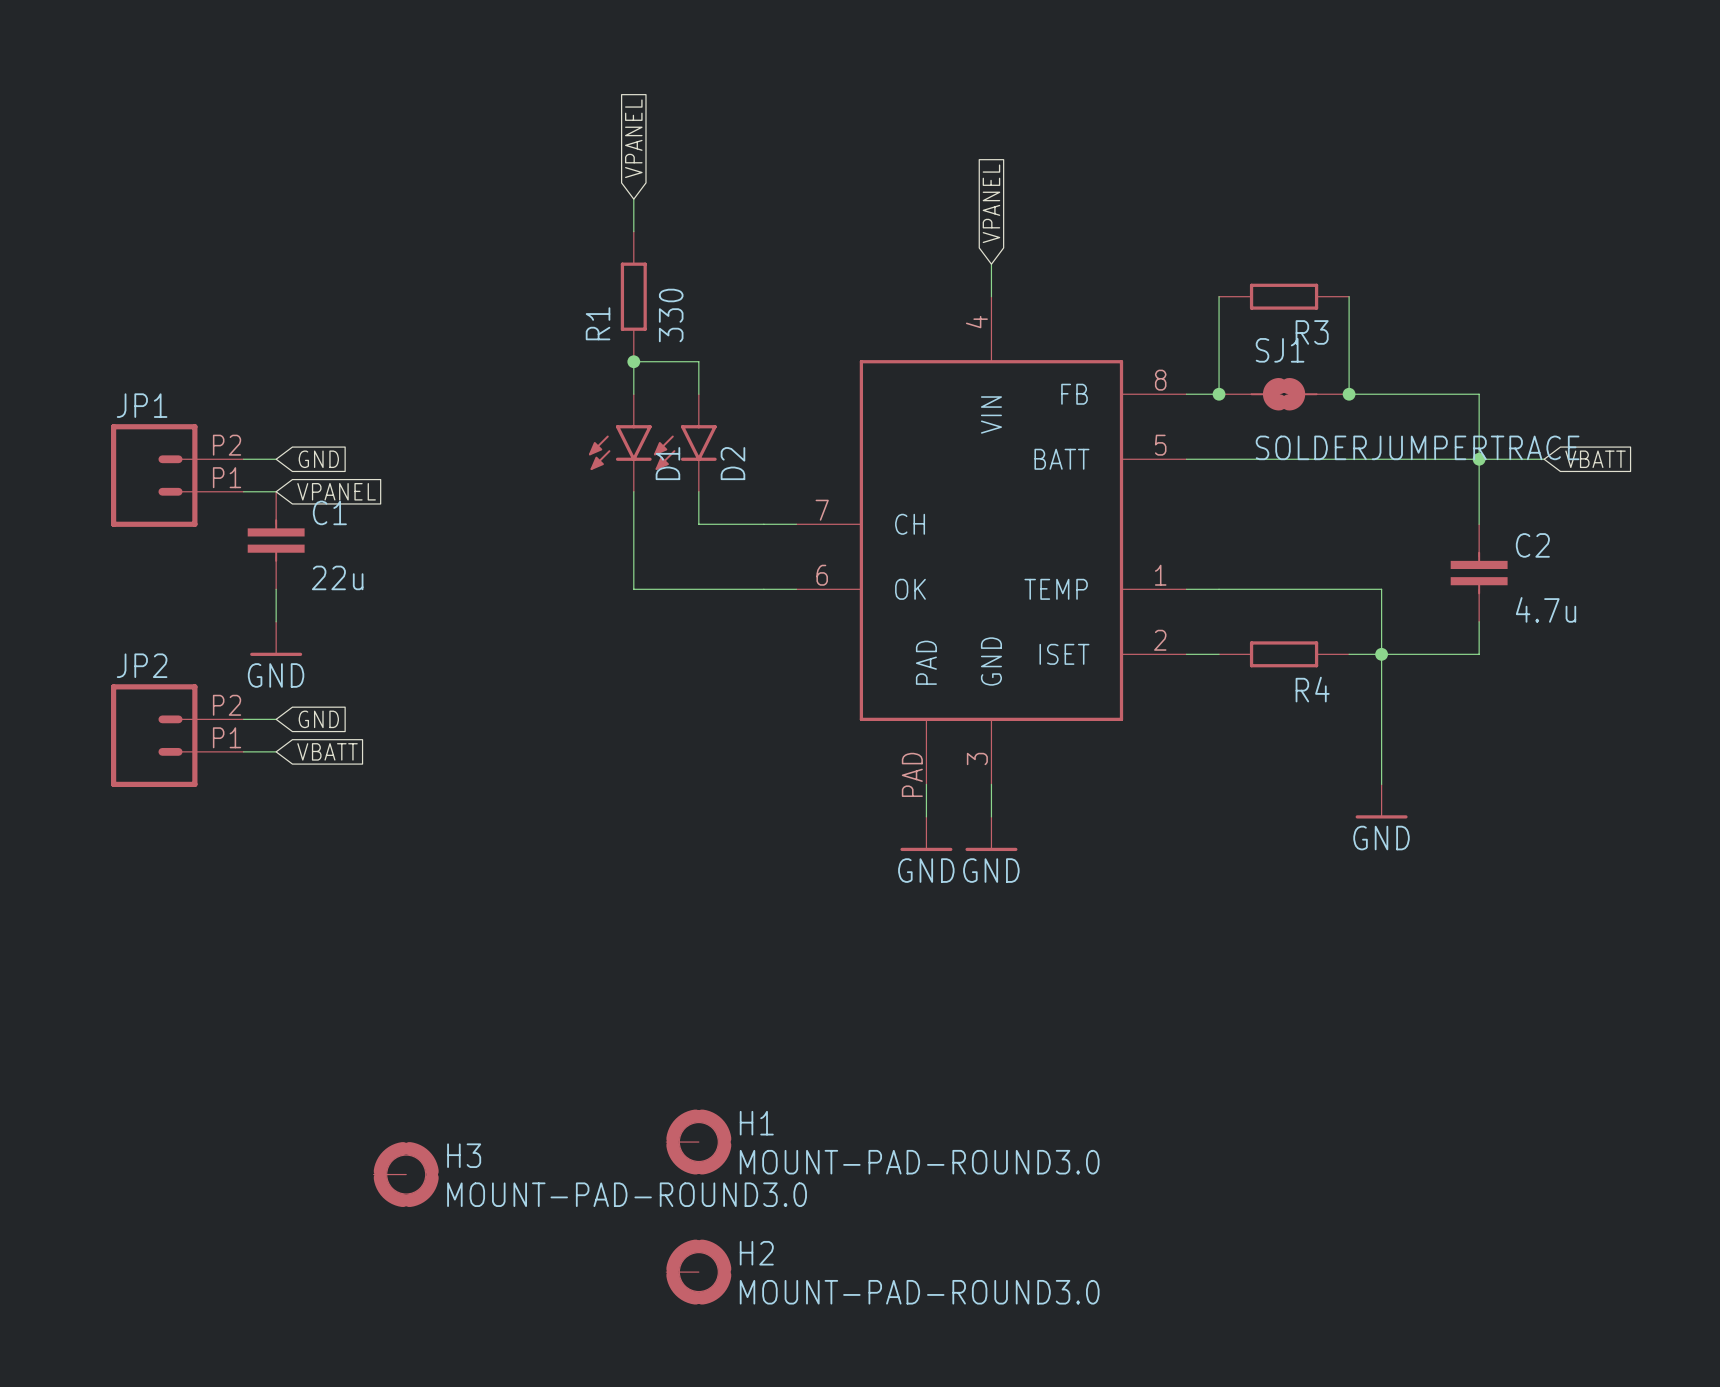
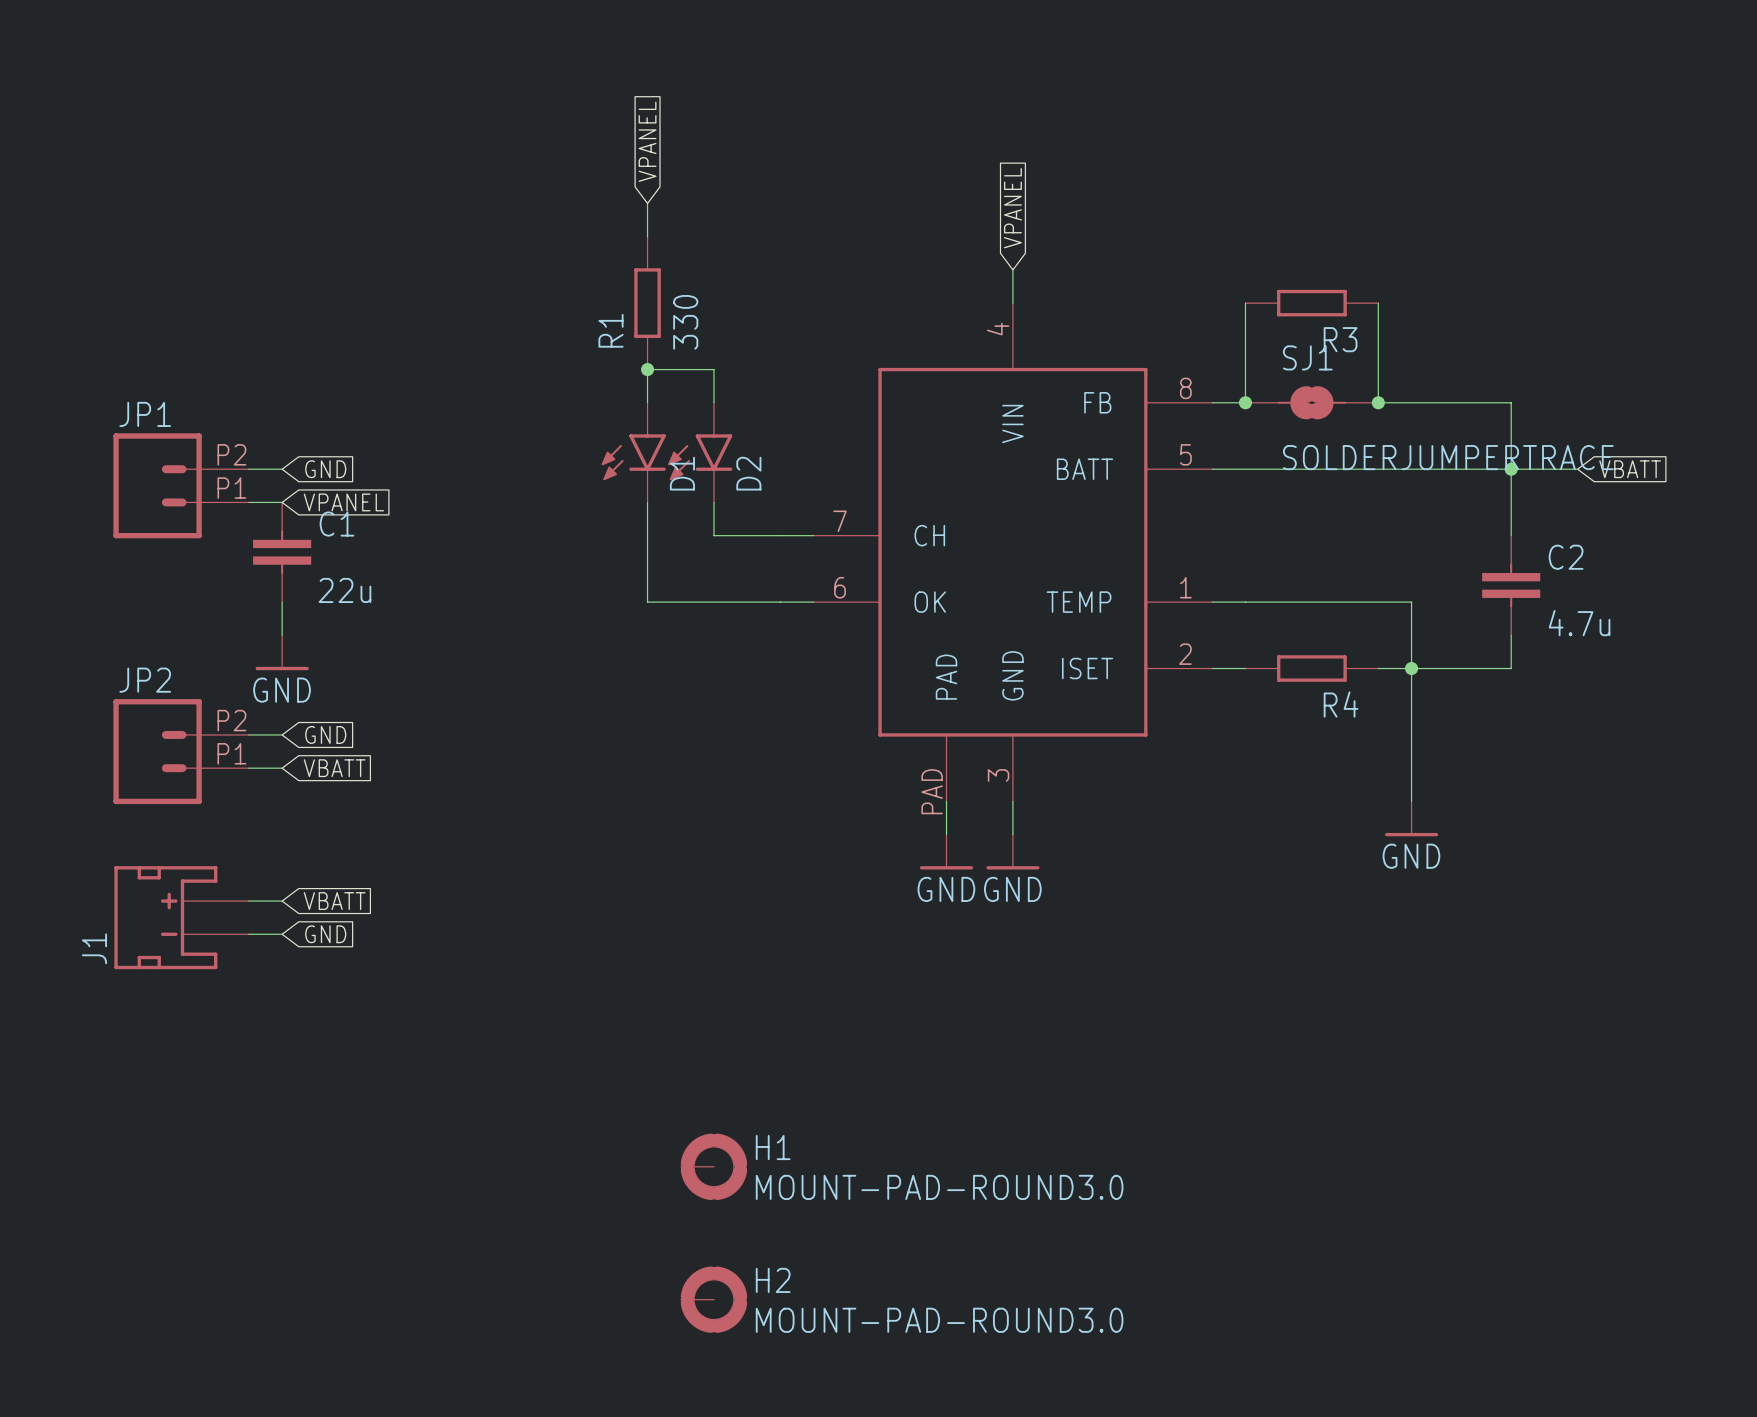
wire: none -> (248, 901) (282, 901)
global label: none -> VBATT (334, 901)
J1: none -> (181, 917)
wire: none -> (248, 934) (282, 934)
global label: none -> GND (325, 934)
H3: MOUNT-PAD-ROUND3.0 (406, 1174) -> none

